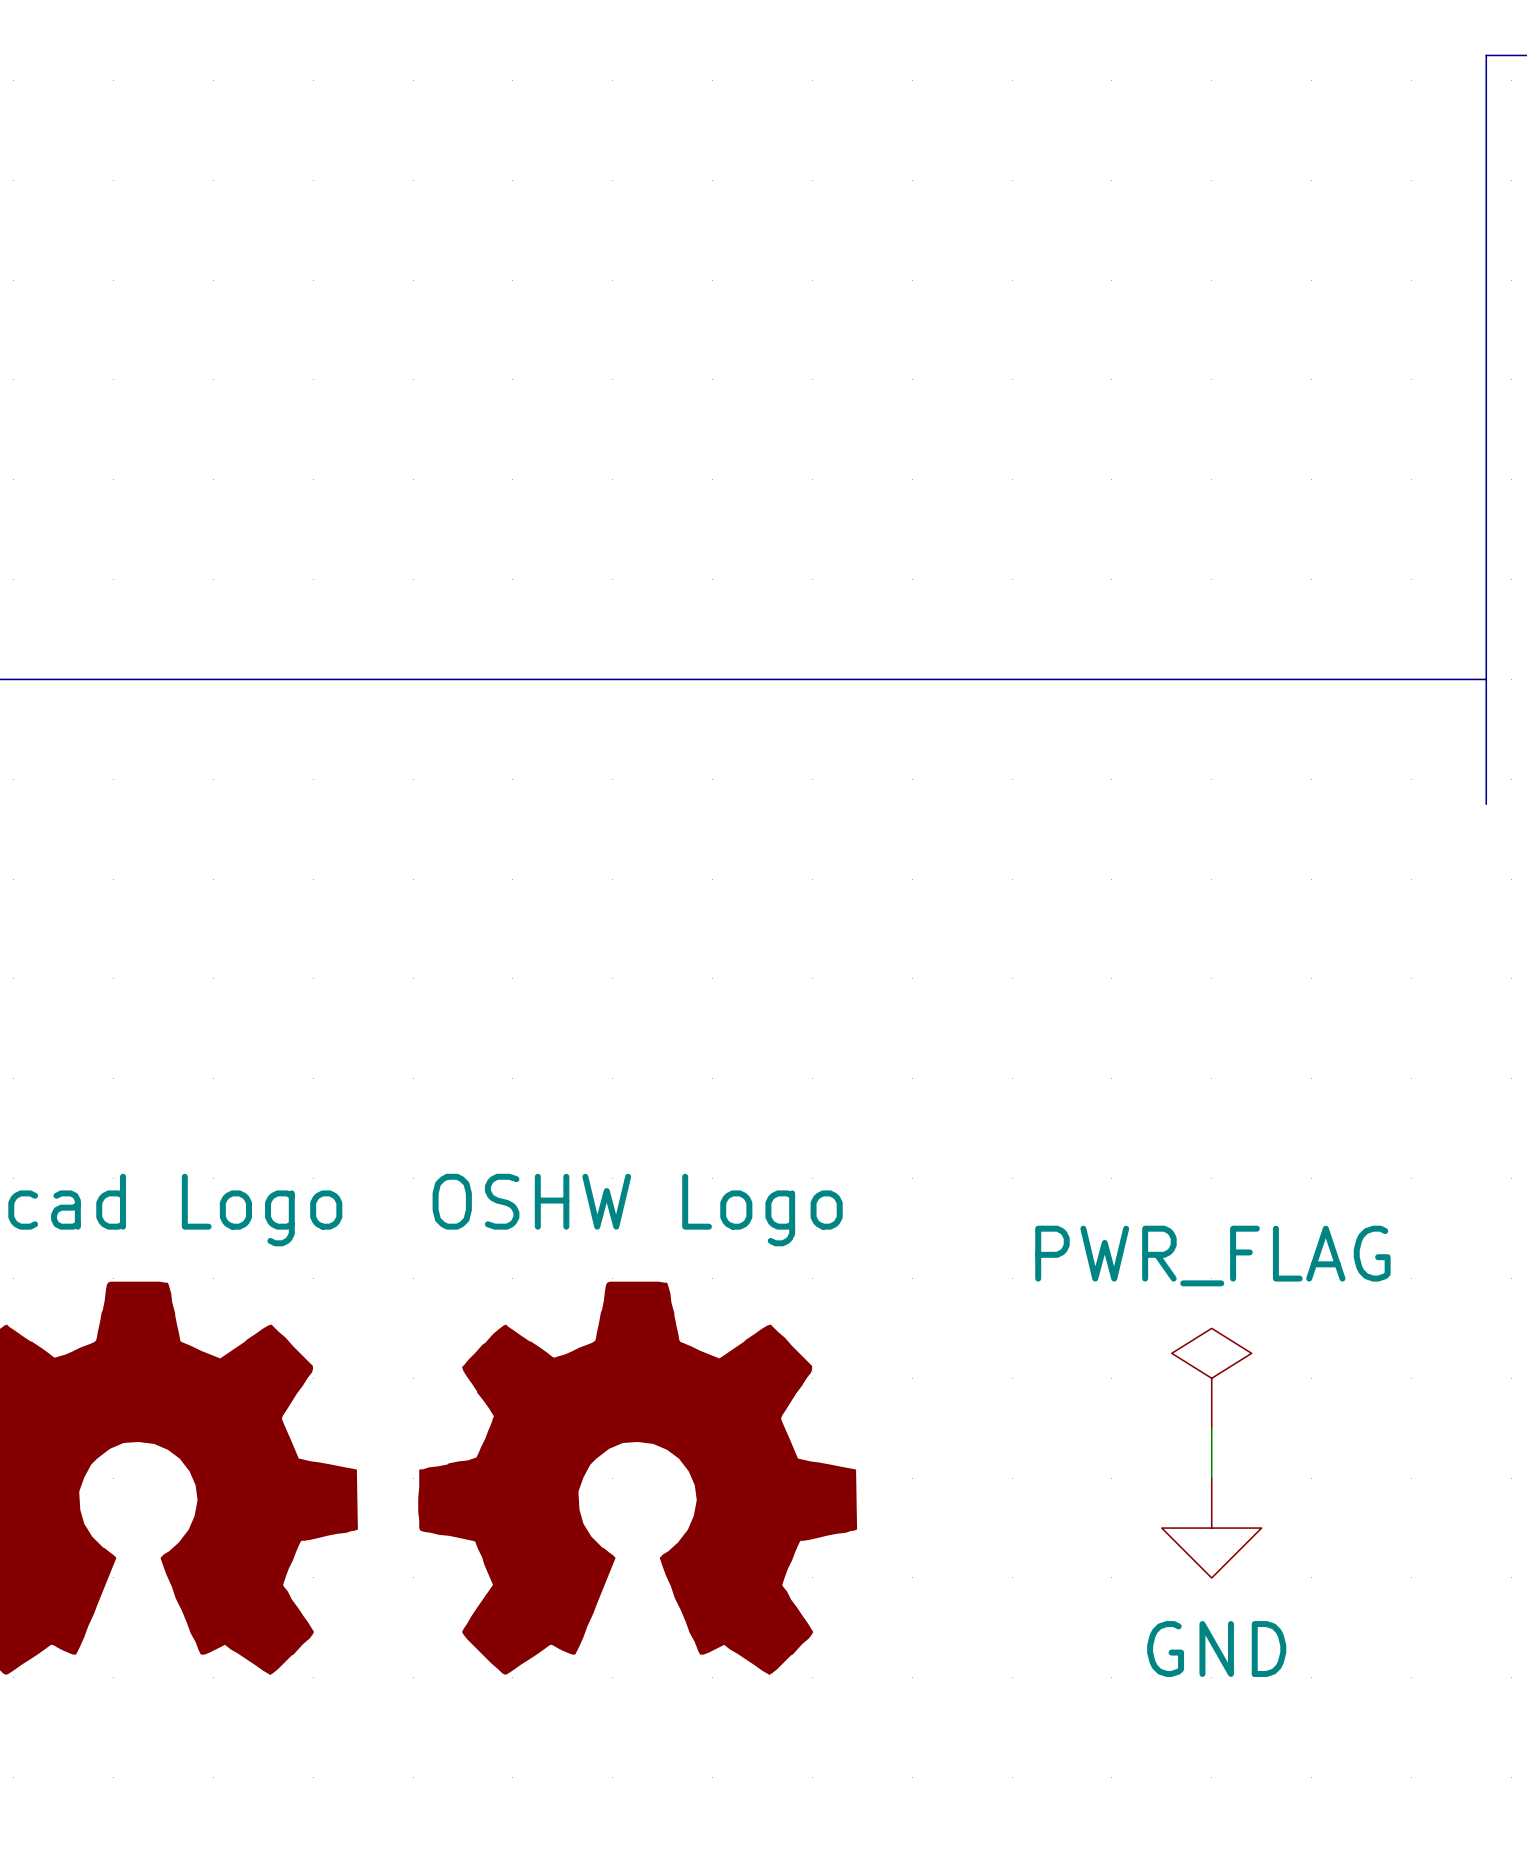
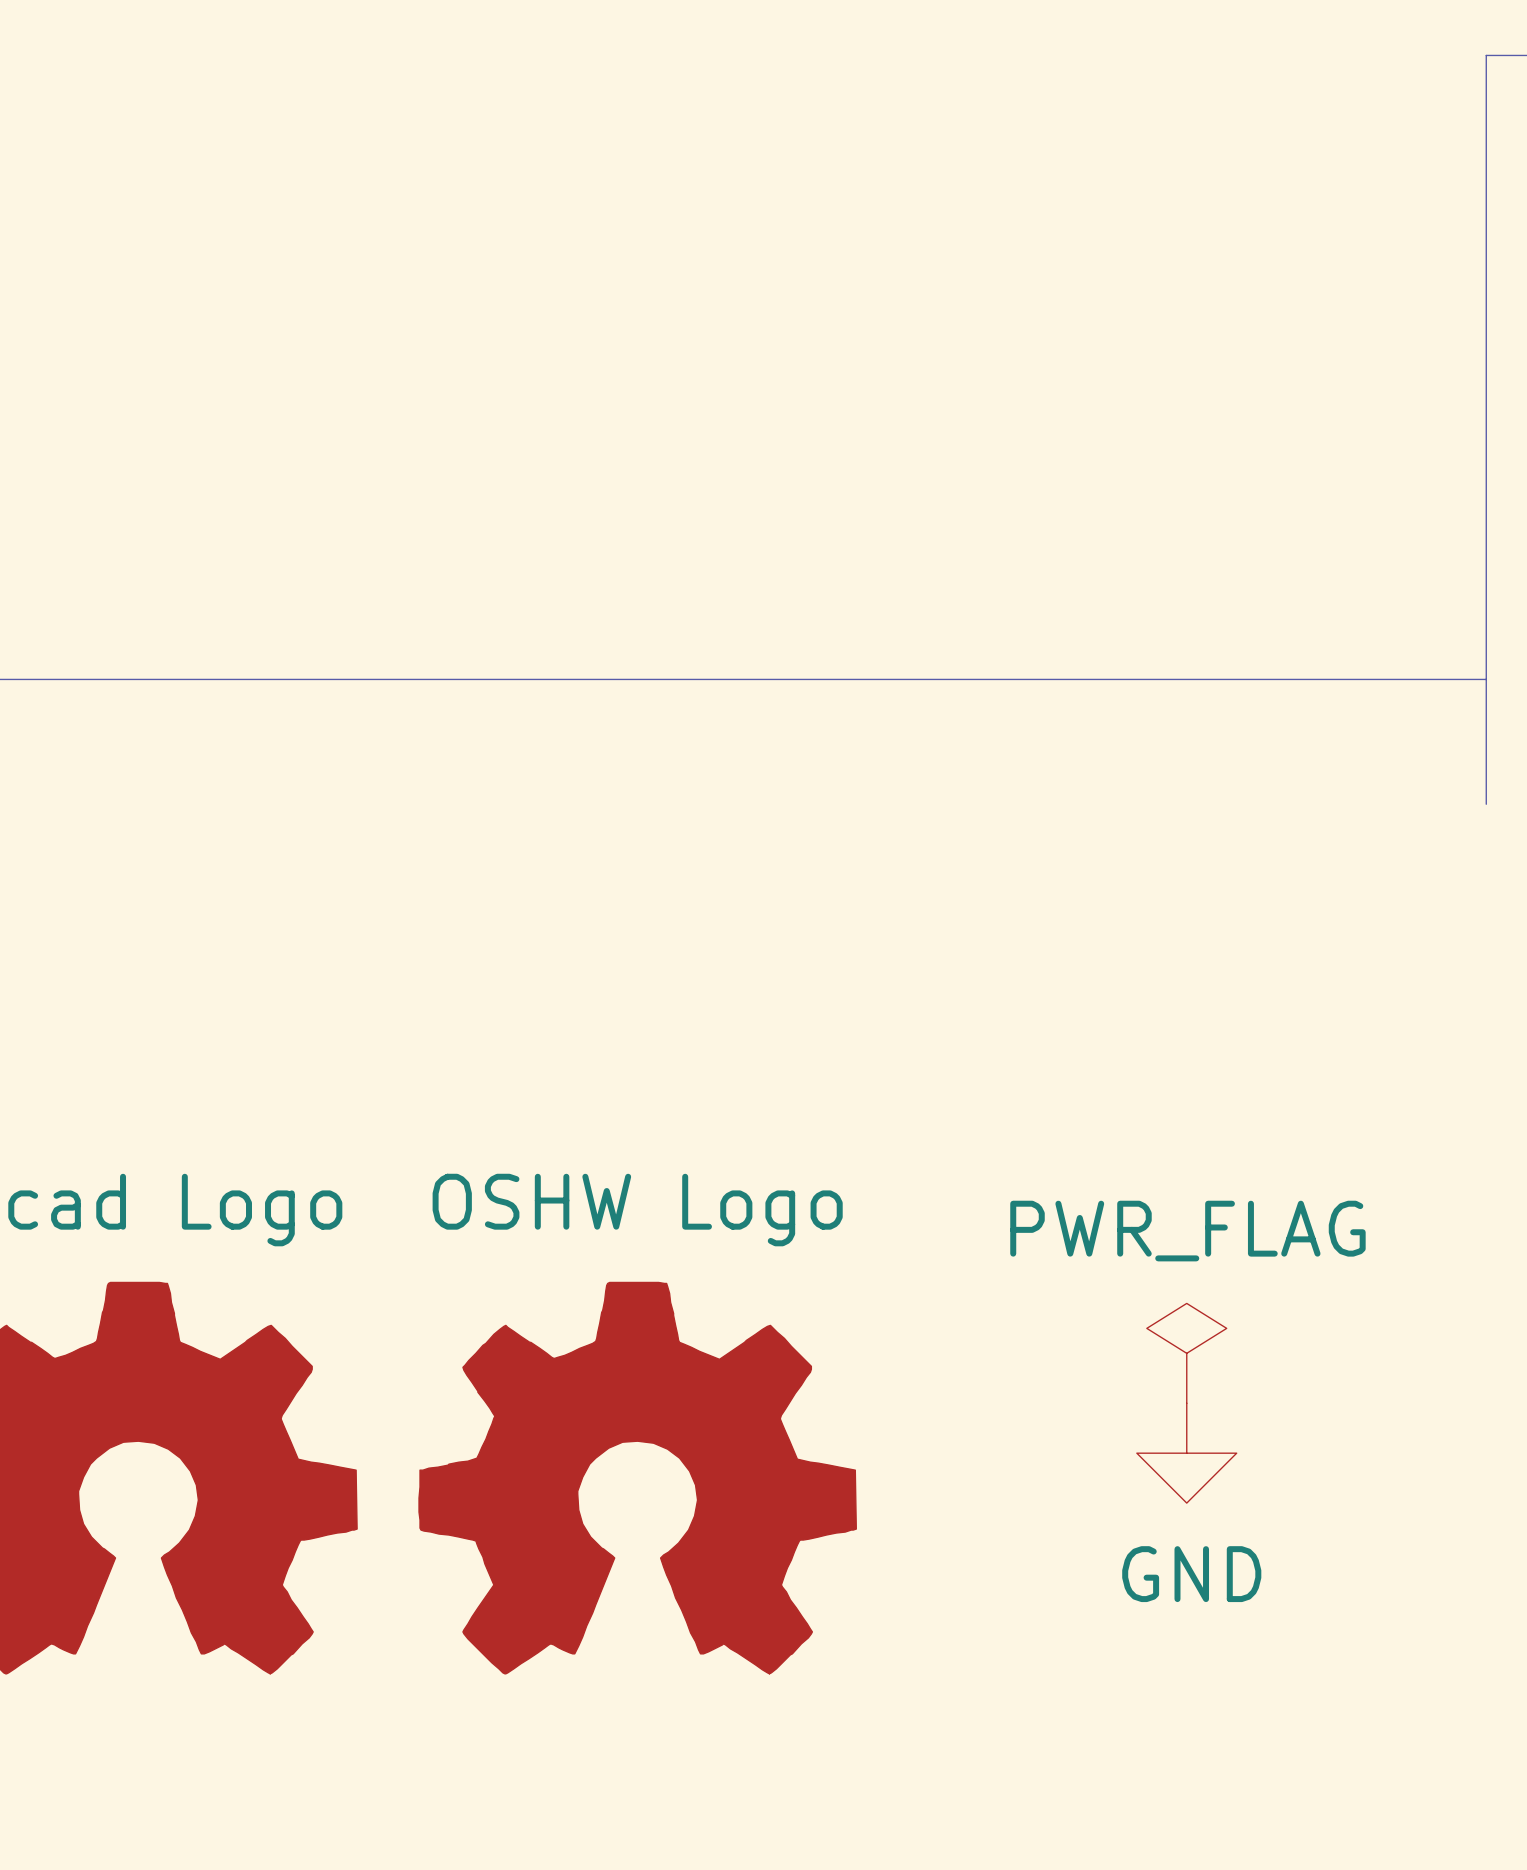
power symbol position: PWR_FLAG (1211, 1378) -> PWR_FLAG (1186, 1353)
wire: (1211, 1428) (1211, 1478) -> none
power symbol position: GND (1211, 1528) -> GND (1186, 1453)

